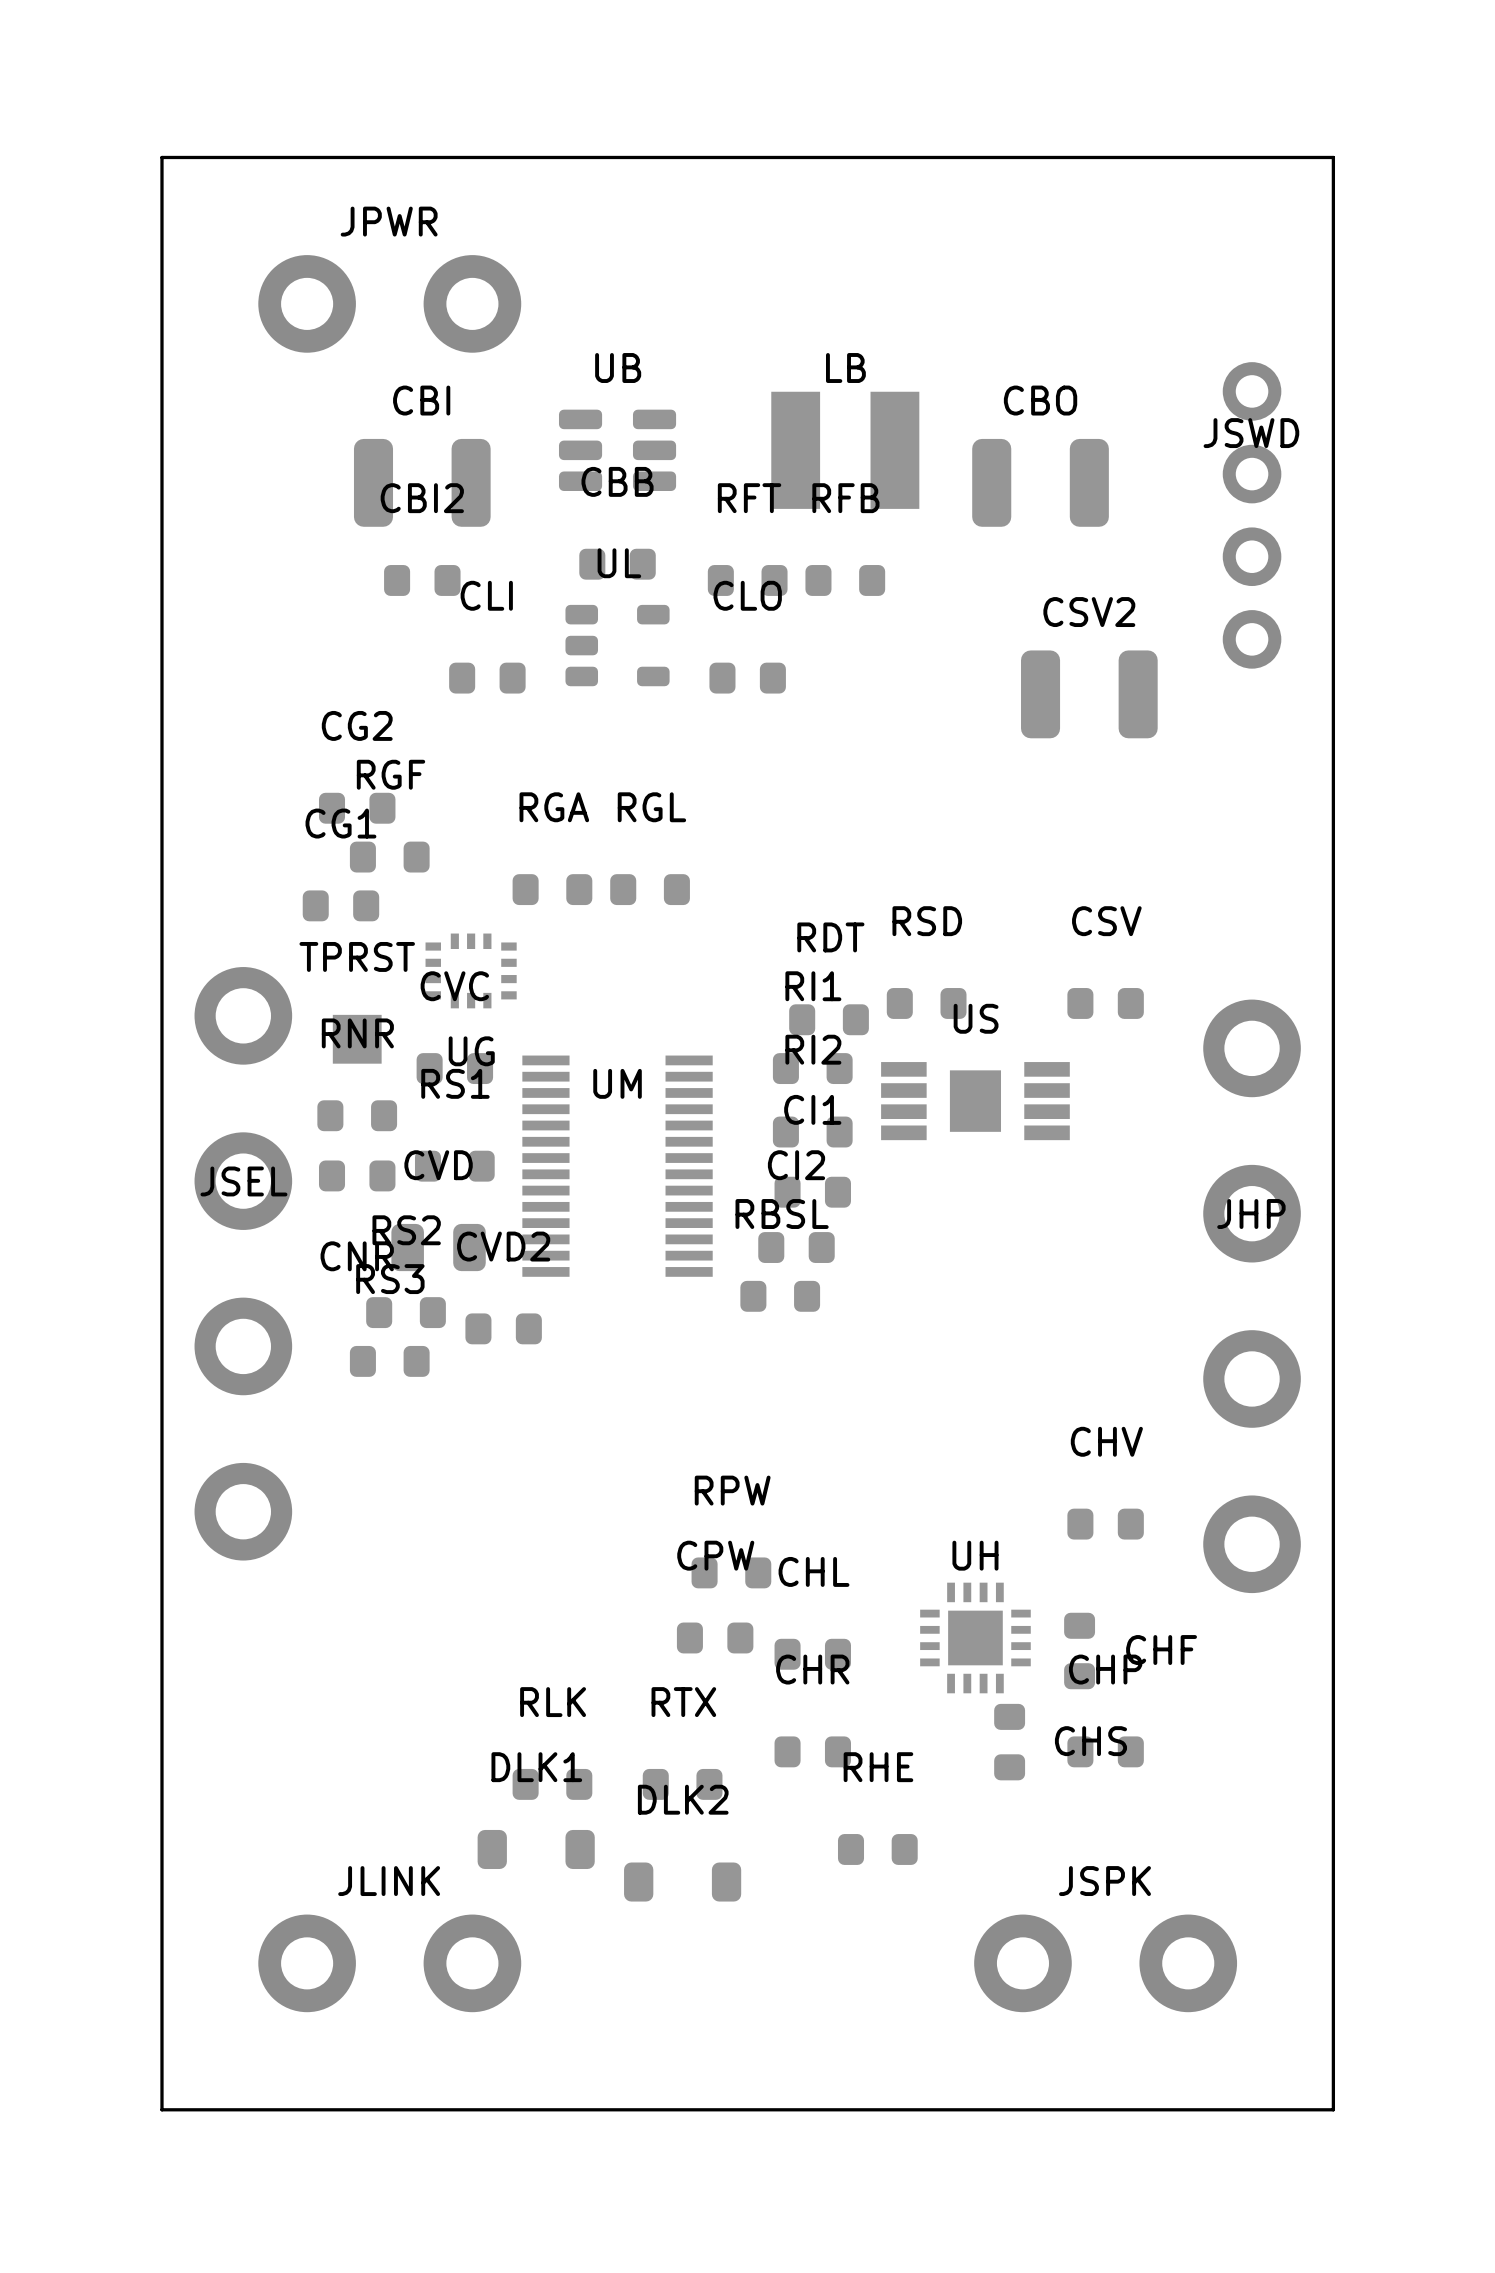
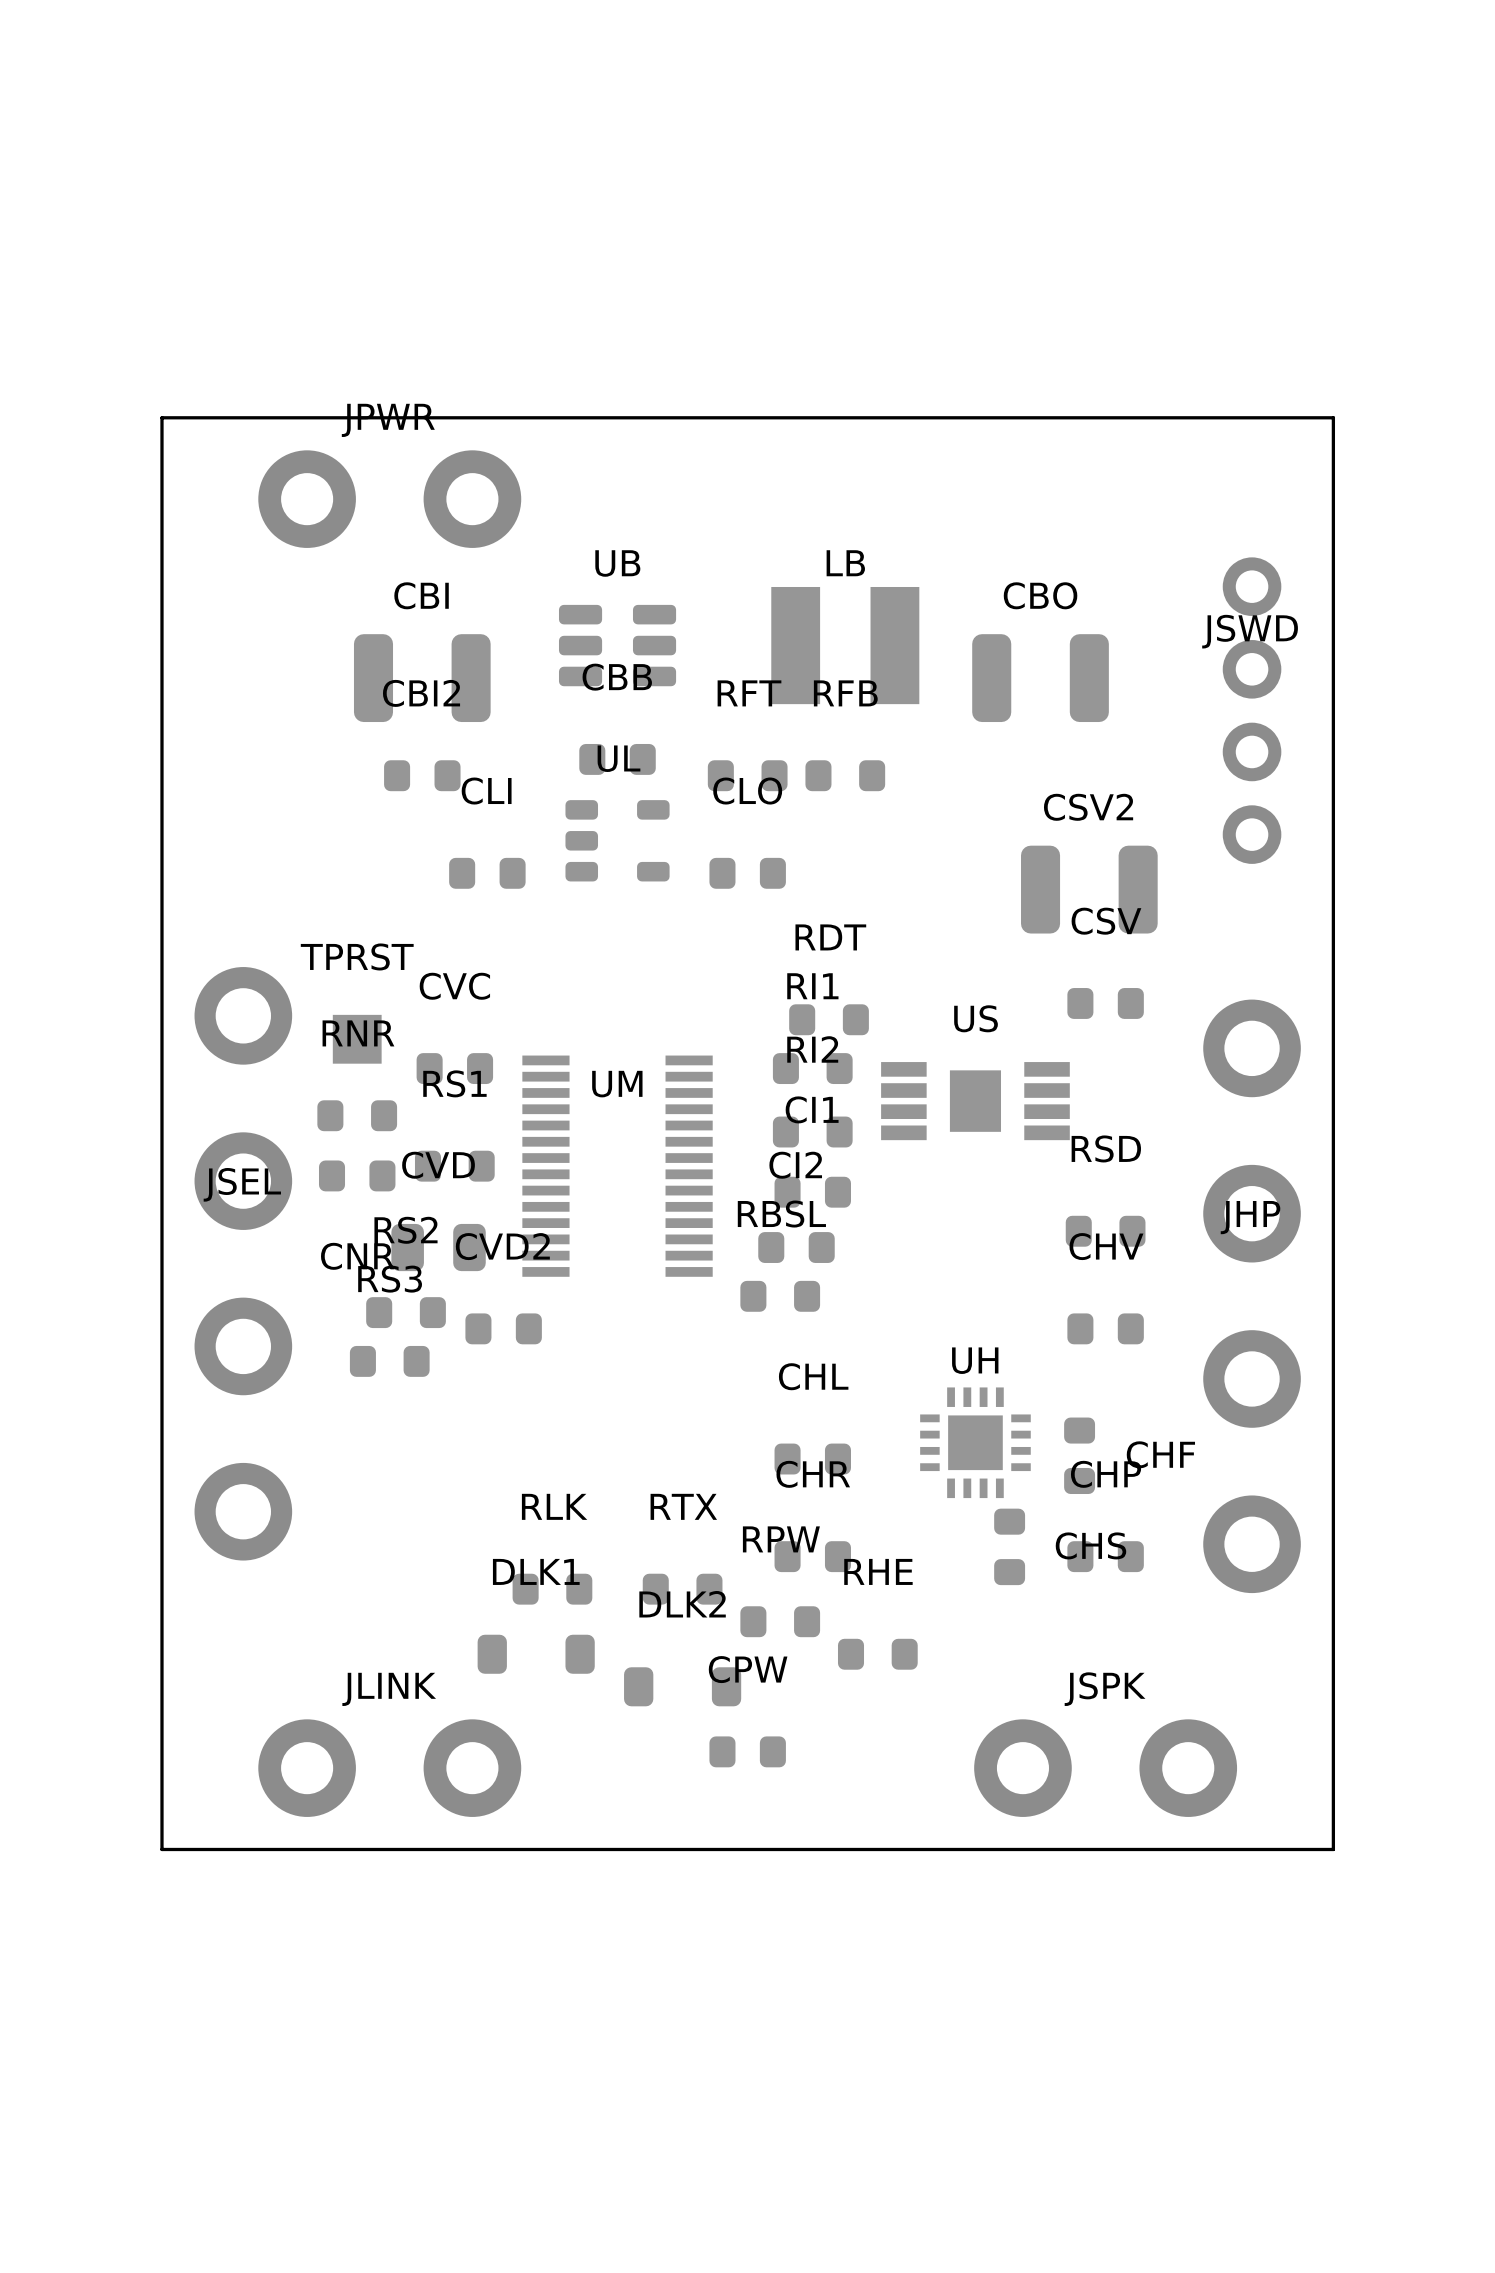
JPWR position: (389, 303) -> (389, 499)
board edge: (161, 417) (161, 157) (1333, 157) (1333, 417) -> (161, 417) (1333, 417)
UB position: (617, 450) -> (617, 645)
LB position: (845, 450) -> (845, 645)
CBI position: (422, 482) -> (422, 678)
CBO position: (1040, 482) -> (1040, 678)
JSWD position: (1252, 515) -> (1252, 710)
CBB position: (617, 564) -> (617, 759)
CBI2 position: (422, 580) -> (422, 775)
RFT position: (747, 580) -> (747, 775)
RFB position: (845, 580) -> (845, 775)
UL position: (617, 645) -> (617, 840)
CLI position: (487, 678) -> (487, 873)
CLO position: (747, 678) -> (747, 873)
CSV2 position: (1089, 694) -> (1089, 889)
CG2: (357, 808) -> none
RGF: (389, 857) -> none
RGA: (552, 889) -> none
RGL: (650, 889) -> none
CG1: (340, 905) -> none
UG: (471, 970) -> none
RSD position: (926, 1003) -> (1105, 1231)
CHV: none -> (1105, 1328)
CHV name: CHV (1106, 1441) -> CHP (1106, 1474)
CHV position: (1105, 1524) -> (1105, 1556)
RPW position: (731, 1572) -> (780, 1621)
CPW position: (715, 1637) -> (747, 1751)
UH position: (975, 1637) -> (975, 1442)
CHF position: (1079, 1651) -> (1079, 1455)
CHL position: (812, 1654) -> (812, 1459)
CHS position: (1009, 1742) -> (1009, 1546)
CHR position: (812, 1751) -> (812, 1556)
CHP: (1105, 1751) -> none
RLK position: (552, 1784) -> (552, 1589)
RTX position: (682, 1784) -> (682, 1589)
board edge: (161, 1849) (161, 2109) (1333, 2109) (1333, 1849) -> (161, 1849) (1333, 1849)
DLK1 position: (536, 1849) -> (536, 1654)
RHE position: (877, 1849) -> (877, 1654)
DLK2 position: (682, 1882) -> (682, 1686)
JLINK position: (389, 1963) -> (389, 1768)
JSPK position: (1105, 1963) -> (1105, 1768)

